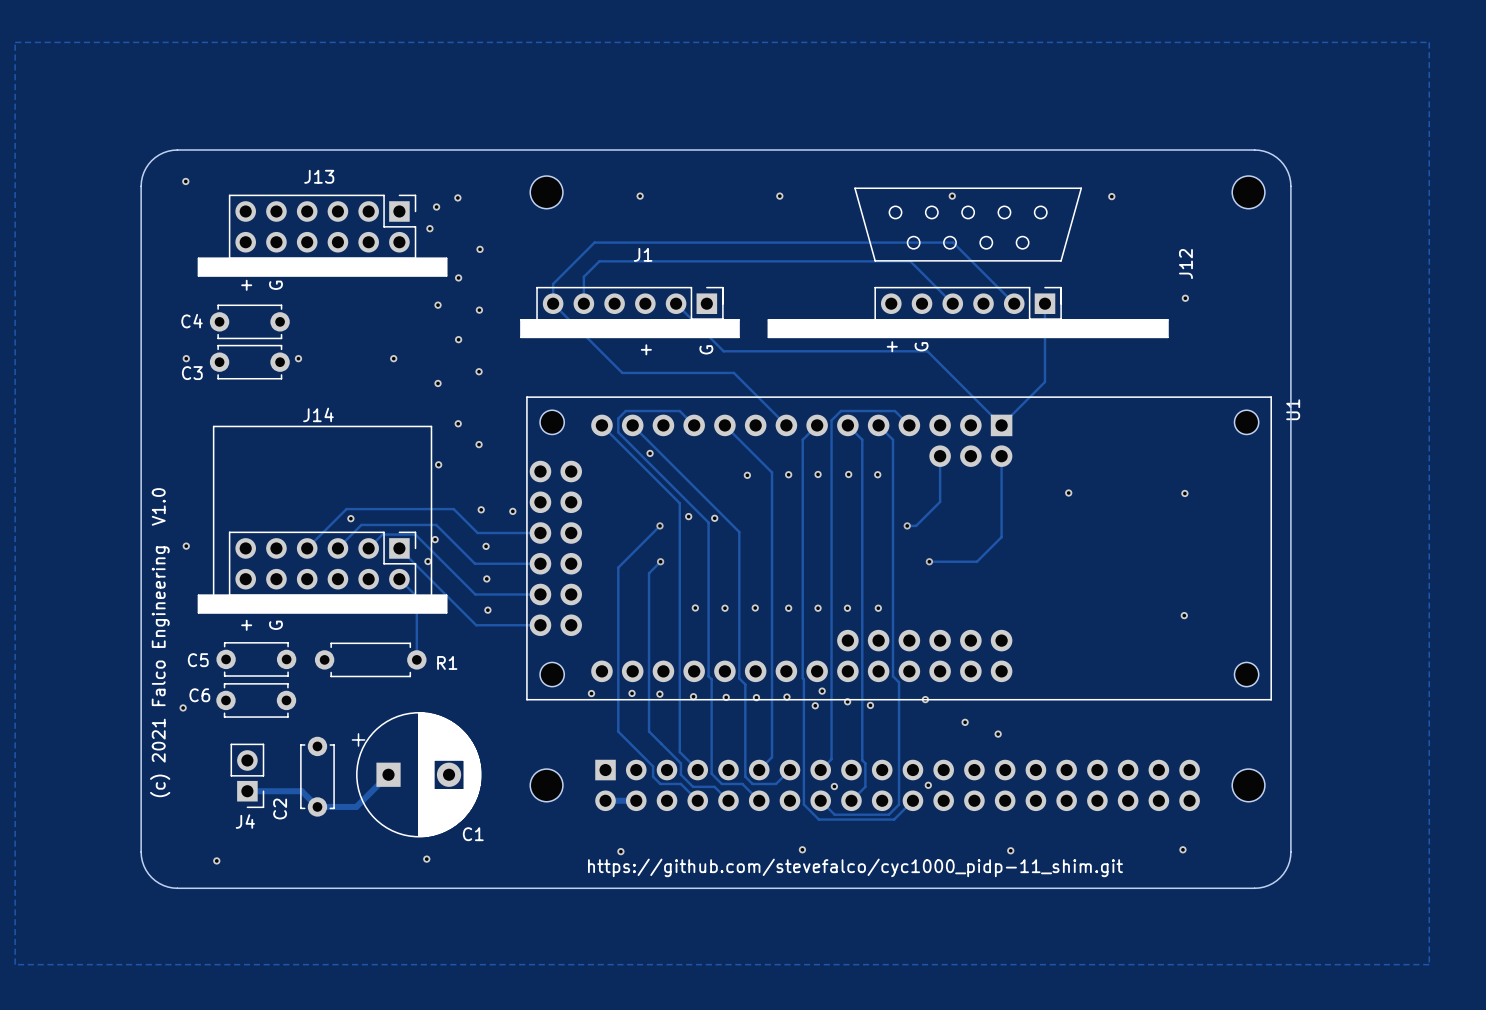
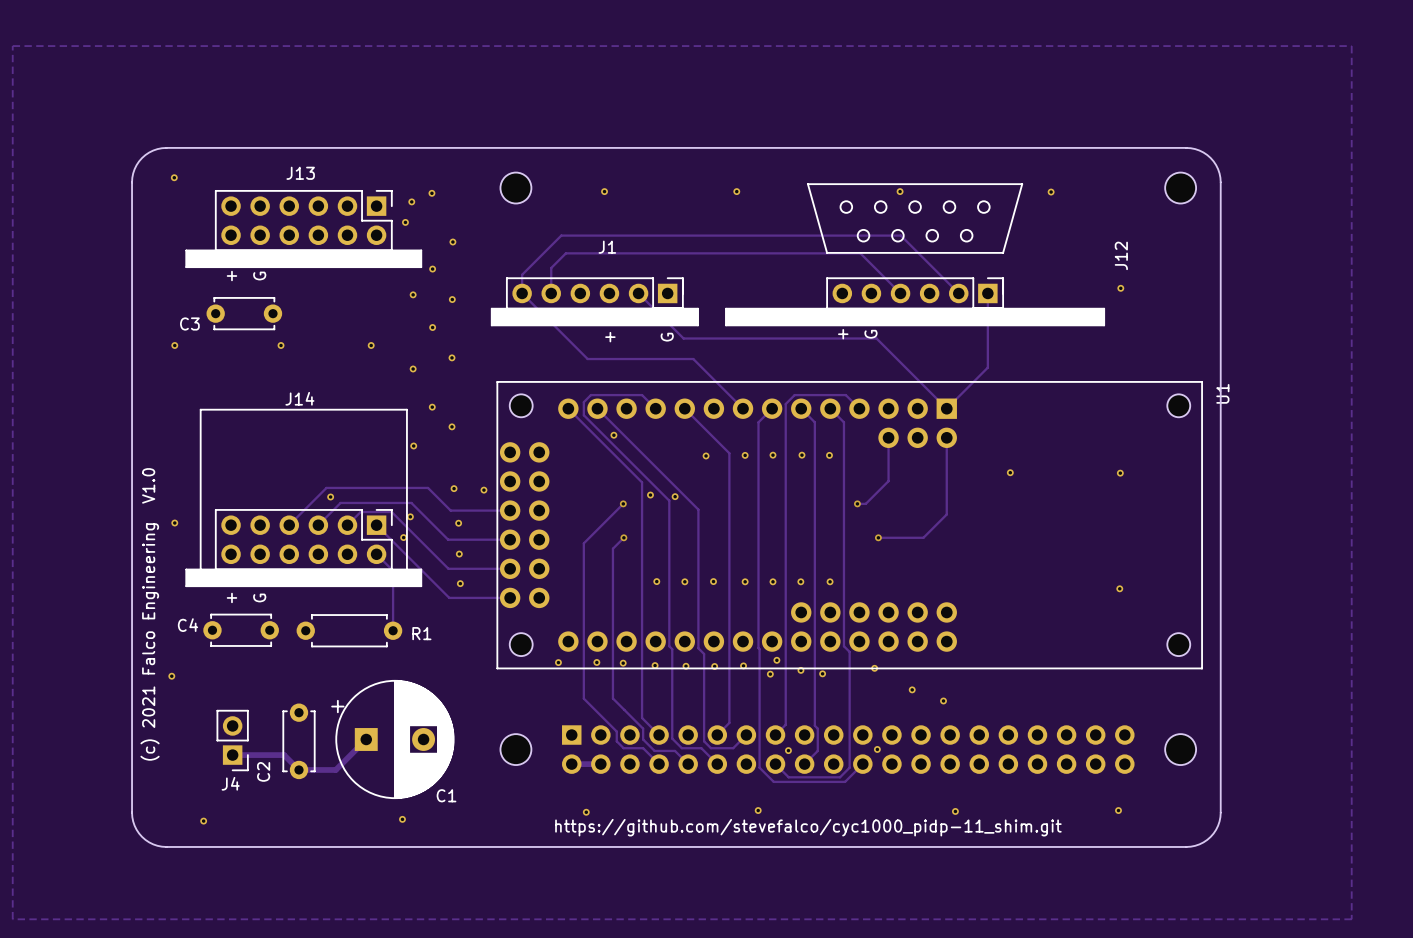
C4: (249, 321) -> none
C3 position: (249, 362) -> (244, 313)
C5 name: C5 (198, 660) -> C4 (188, 625)
C6: (256, 700) -> none

